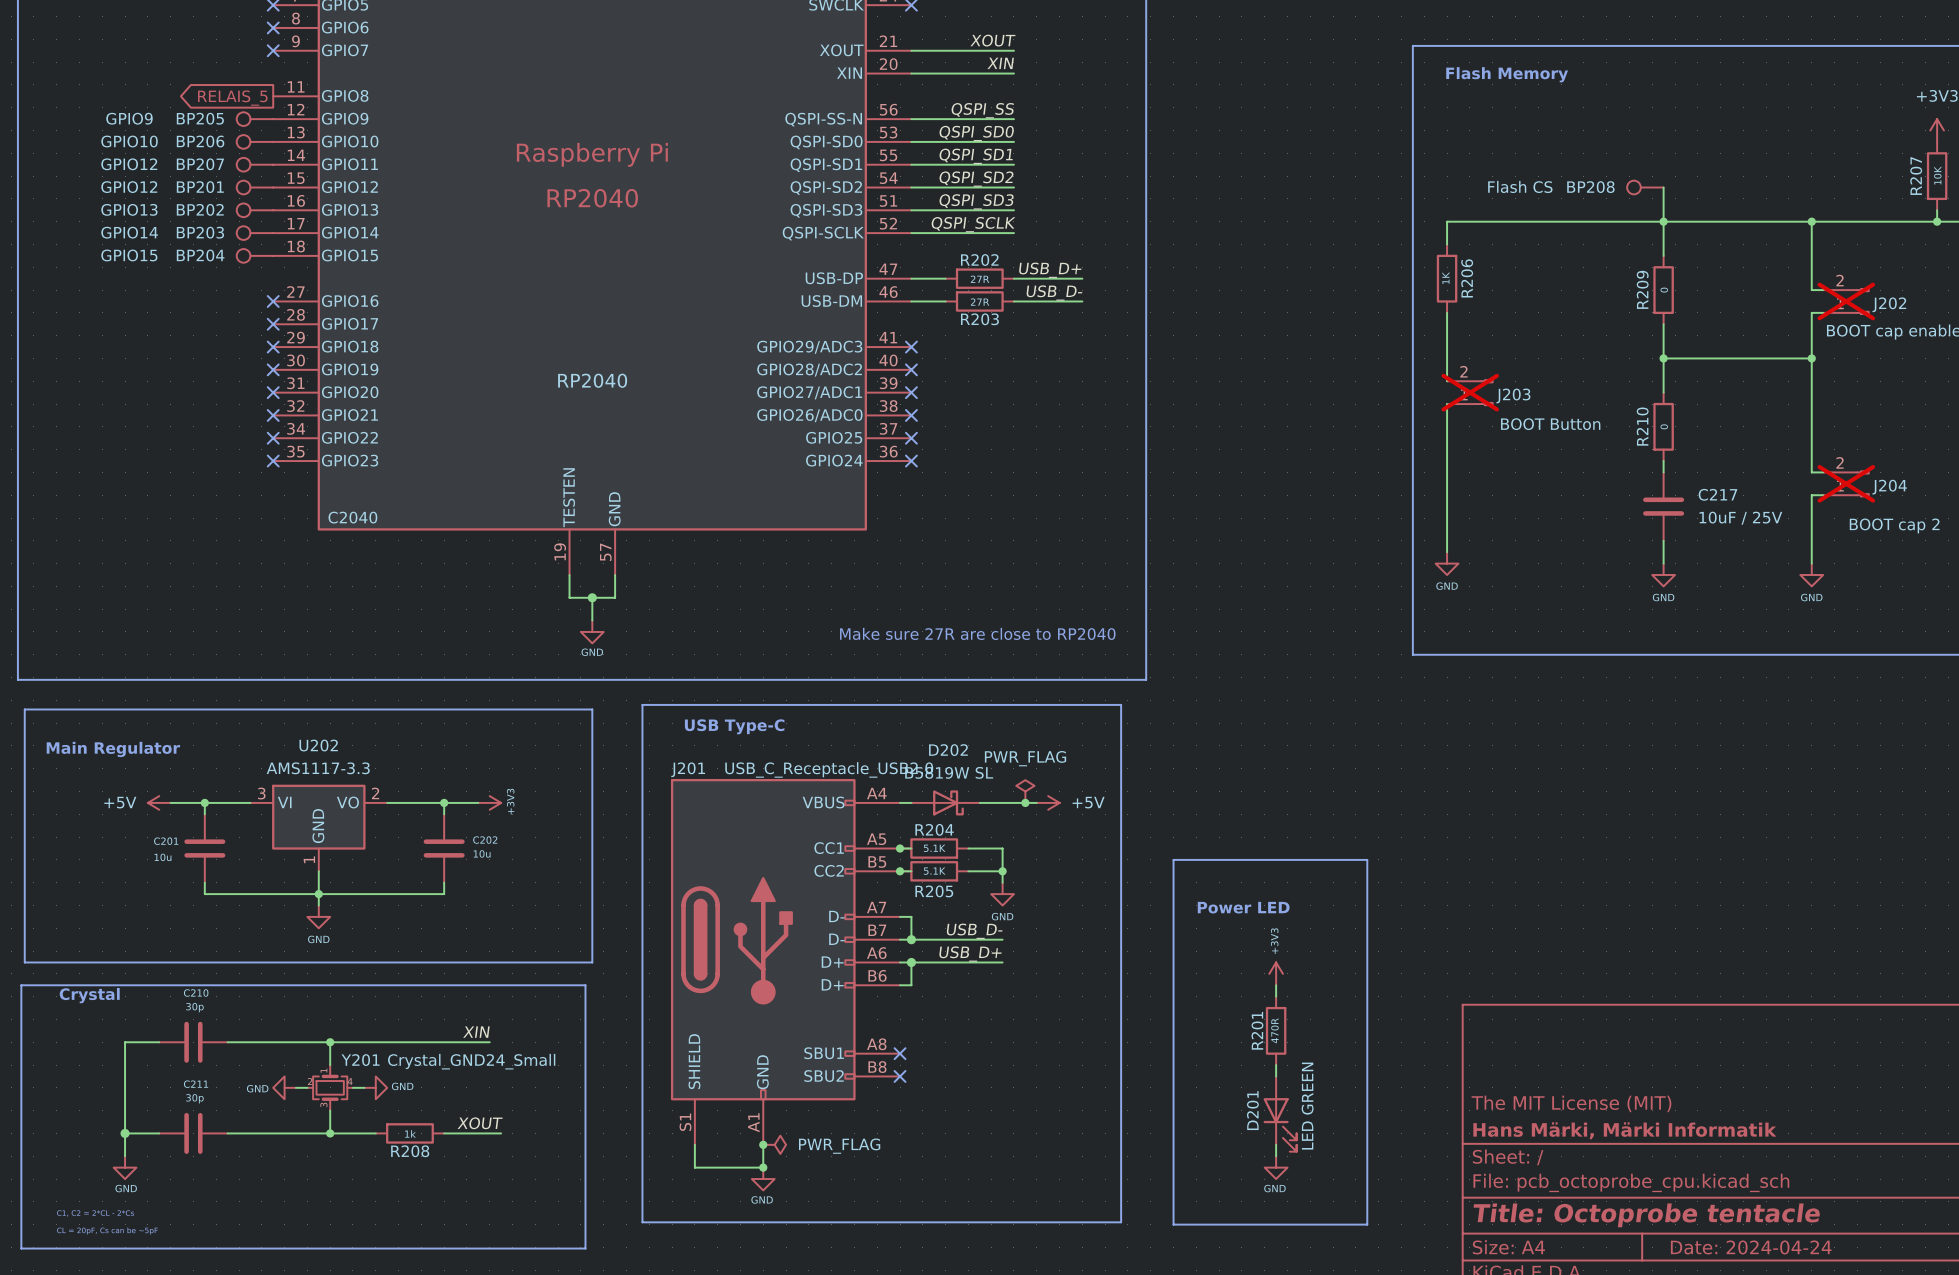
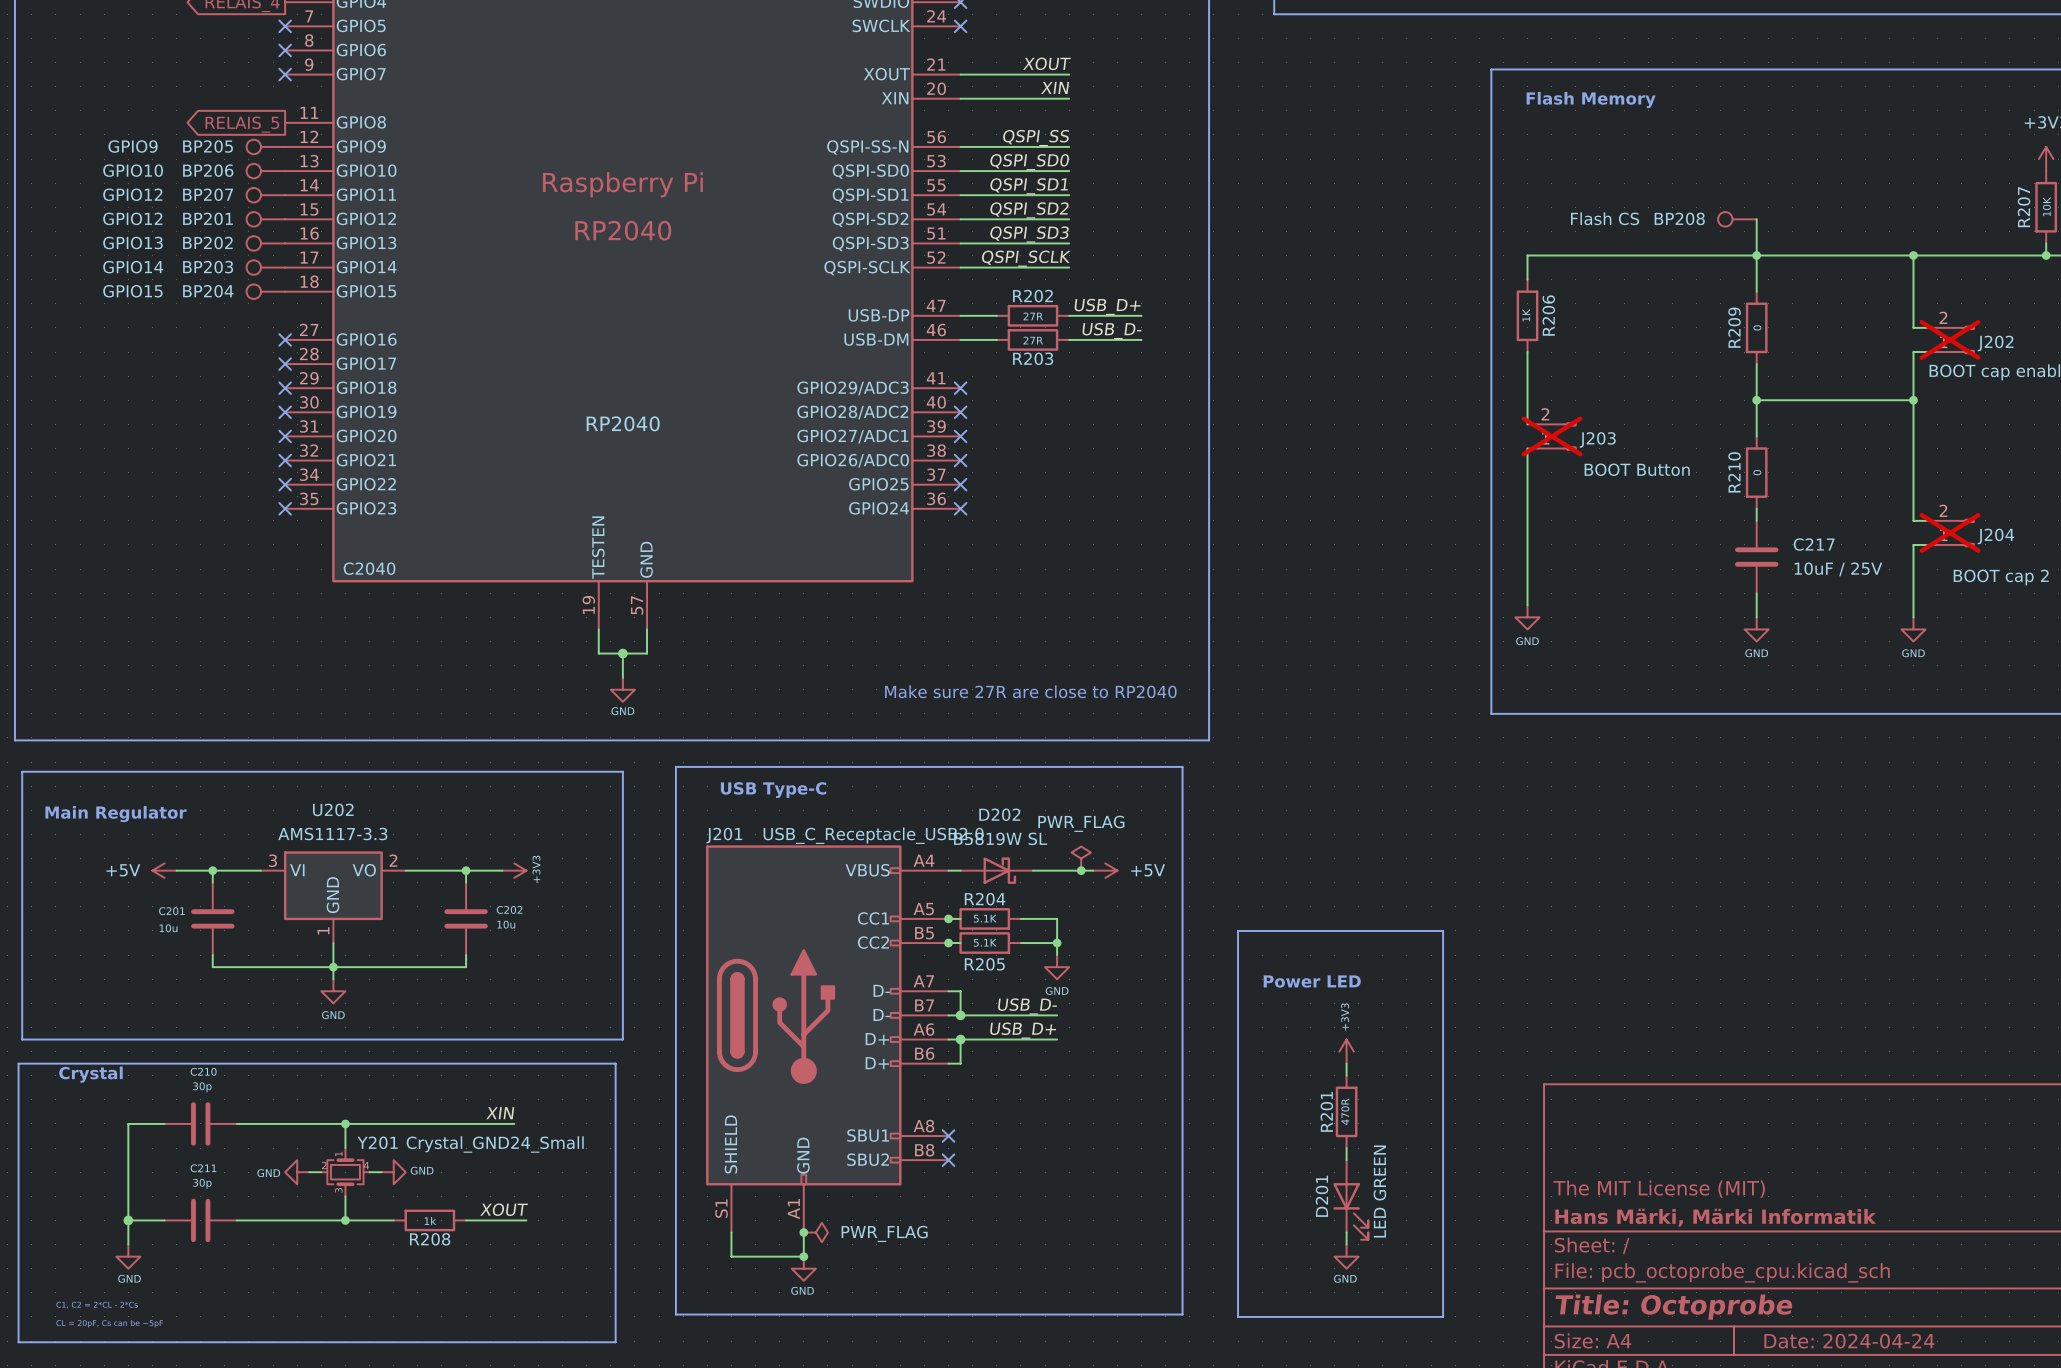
title block: Title: Octoprobe tentacle (1646, 1215) -> Title: Octoprobe (1674, 1307)

